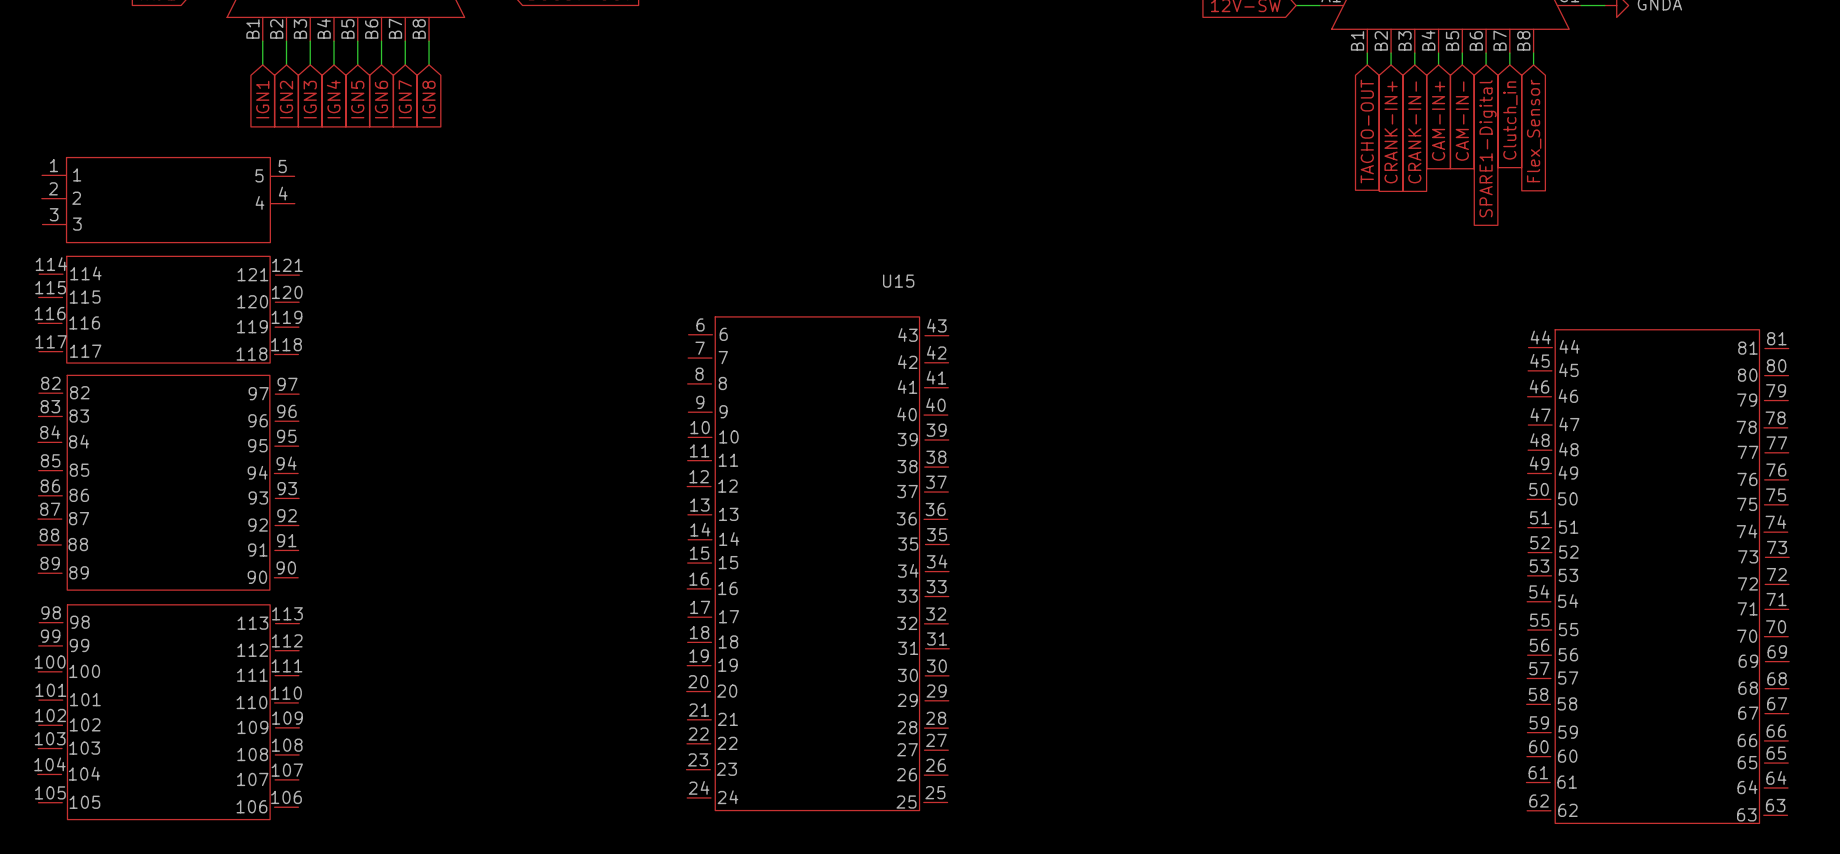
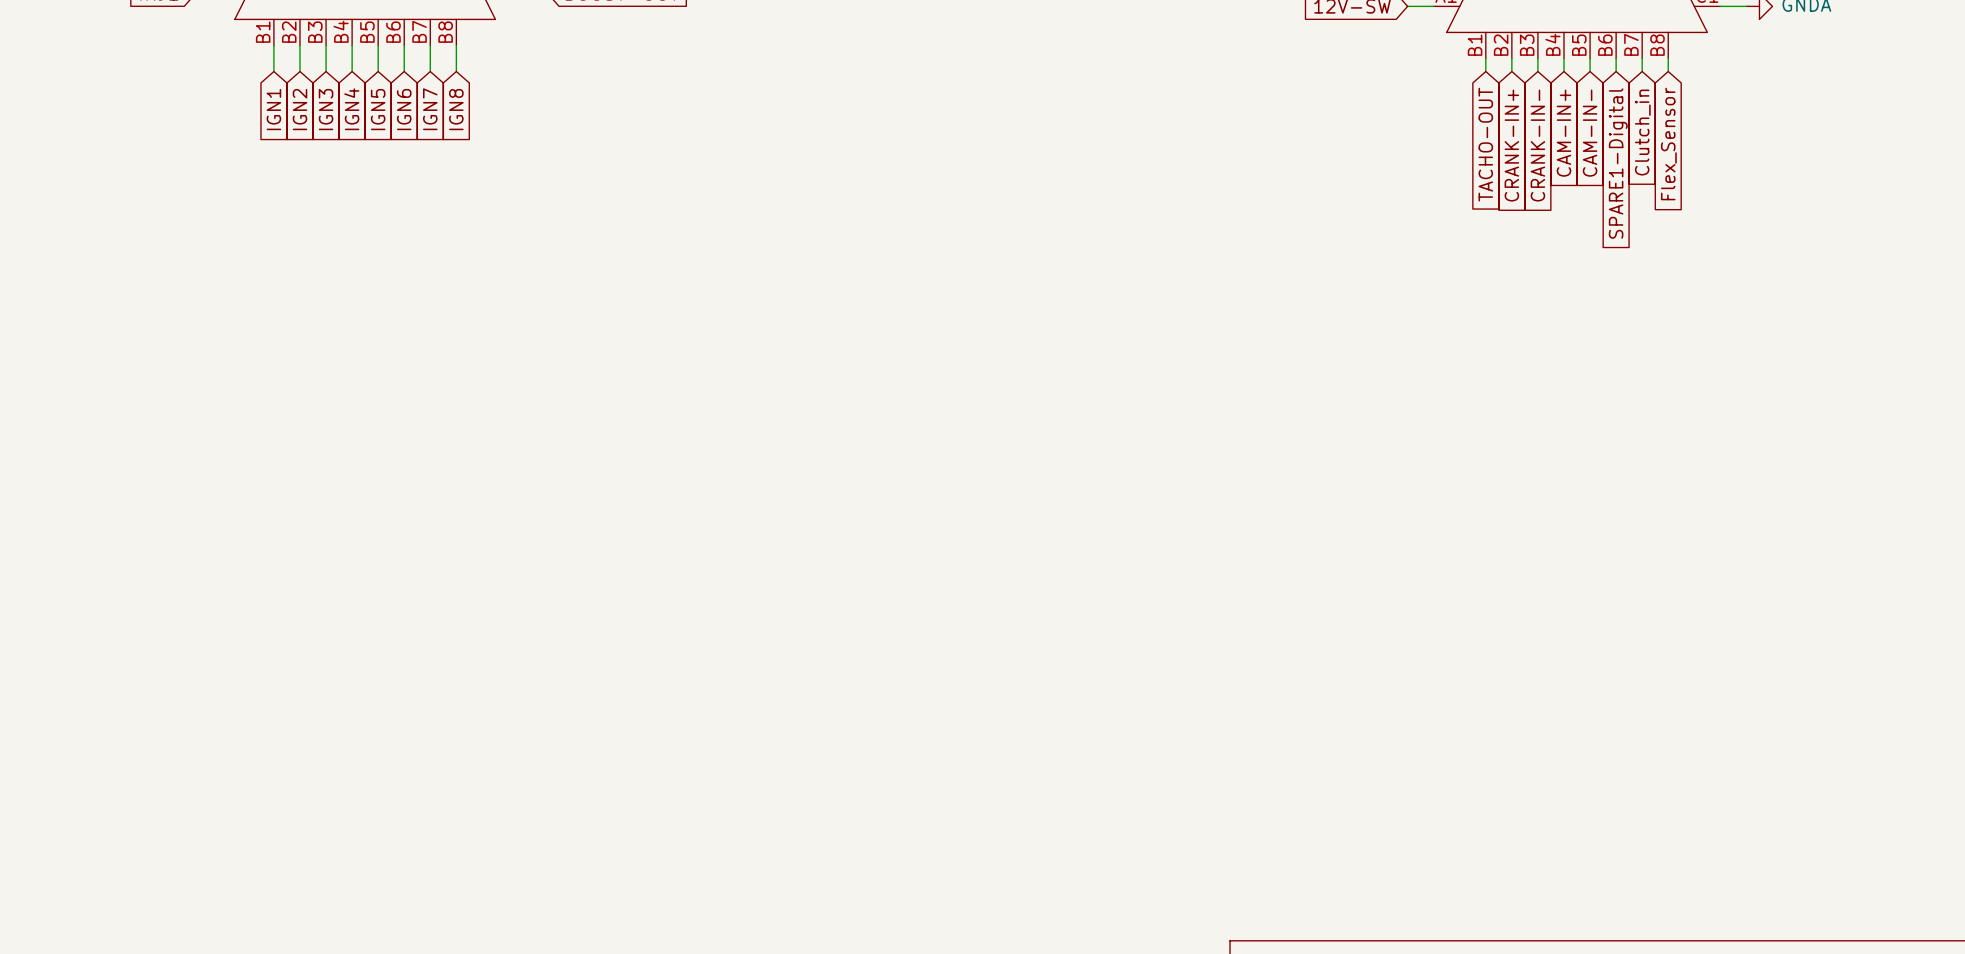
U15: (913, 490) -> none

